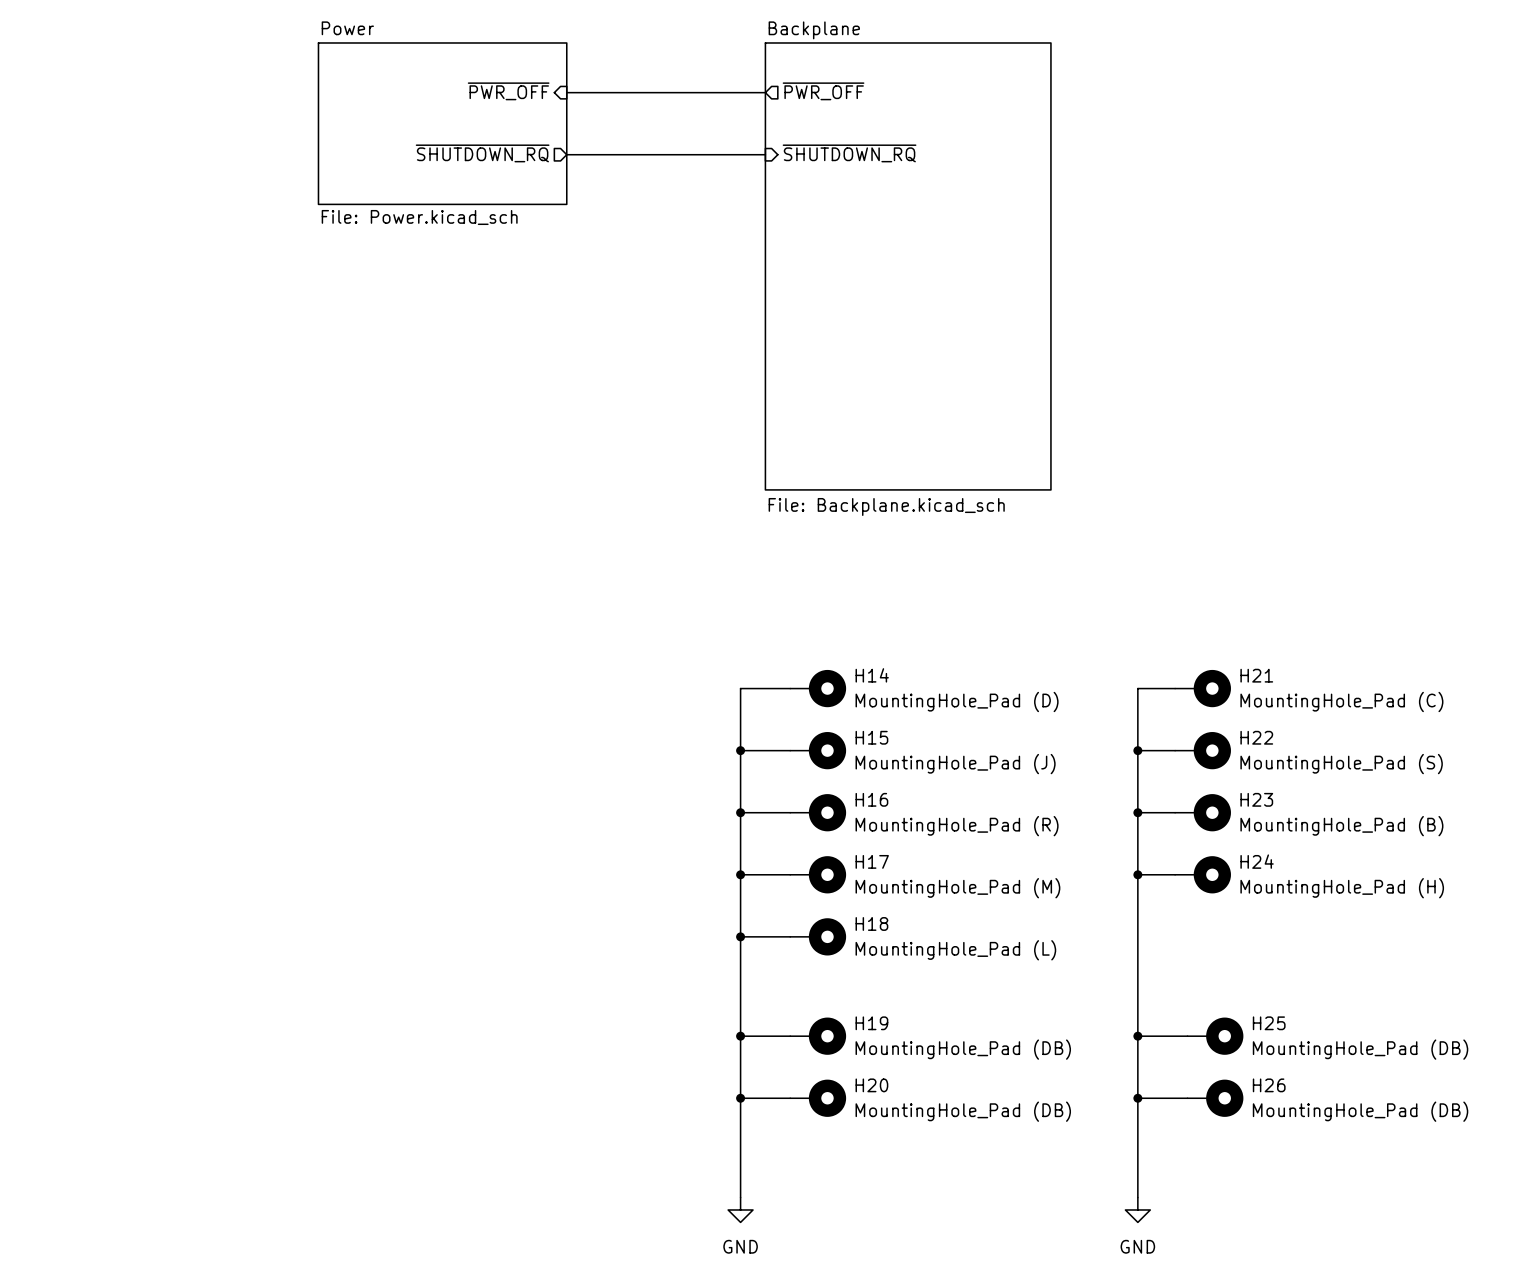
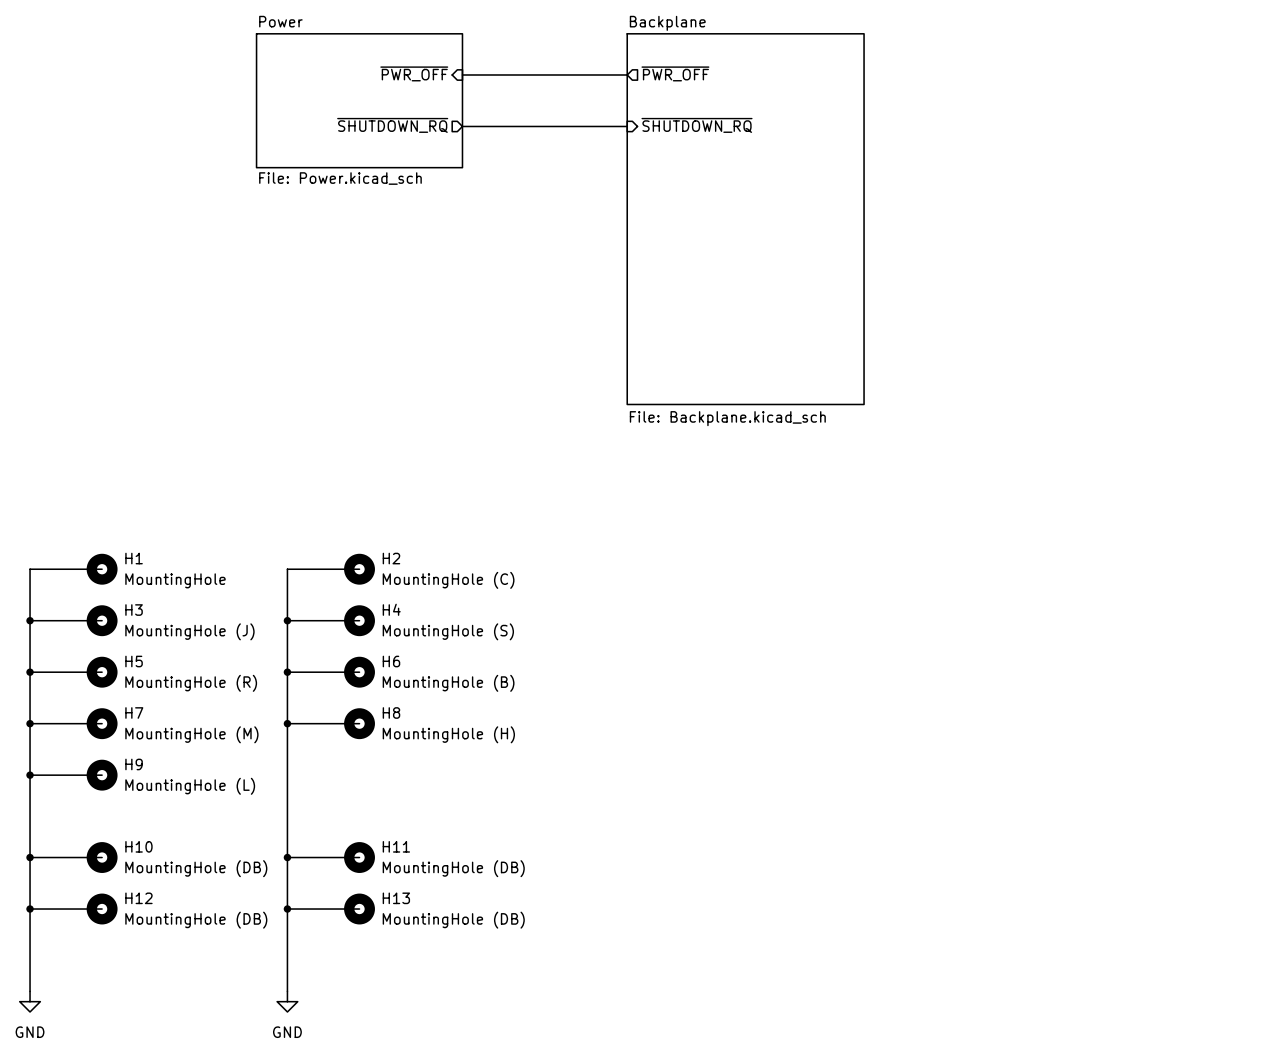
wire: none -> (102, 569) (30, 569) (30, 991)
H1: none -> MountingHole (102, 569)
wire: none -> (359, 569) (287, 569) (287, 991)
H2: none -> MountingHole (C) (359, 569)
wire: (790, 688) (740, 688) (740, 1197) -> none
H14: MountingHole_Pad (D) (818, 688) -> none
wire: (1175, 688) (1137, 688) (1137, 1197) -> none
H21: MountingHole_Pad (C) (1203, 688) -> none
wire: none -> (30, 620) (102, 620)
junction: none -> (30, 620)
H3: none -> MountingHole (J) (102, 620)
wire: none -> (287, 620) (359, 620)
junction: none -> (287, 620)
H4: none -> MountingHole (S) (359, 620)
wire: (740, 750) (790, 750) -> none
junction: (740, 750) -> none
H15: MountingHole_Pad (J) (818, 750) -> none
wire: (1137, 750) (1175, 750) -> none
junction: (1137, 750) -> none
H22: MountingHole_Pad (S) (1203, 750) -> none
wire: none -> (30, 672) (102, 672)
junction: none -> (30, 672)
H5: none -> MountingHole (R) (102, 672)
wire: none -> (287, 672) (359, 672)
junction: none -> (287, 672)
H6: none -> MountingHole (B) (359, 672)
wire: (740, 812) (790, 812) -> none
junction: (740, 812) -> none
H16: MountingHole_Pad (R) (818, 812) -> none
wire: (1137, 812) (1175, 812) -> none
junction: (1137, 812) -> none
H23: MountingHole_Pad (B) (1203, 812) -> none
wire: none -> (30, 723) (102, 723)
junction: none -> (30, 723)
H7: none -> MountingHole (M) (102, 723)
wire: none -> (287, 723) (359, 723)
junction: none -> (287, 723)
H8: none -> MountingHole (H) (359, 723)
wire: (740, 874) (790, 874) -> none
junction: (740, 874) -> none
H17: MountingHole_Pad (M) (818, 874) -> none
wire: (1137, 874) (1175, 874) -> none
junction: (1137, 874) -> none
H24: MountingHole_Pad (H) (1203, 874) -> none
wire: none -> (30, 775) (102, 775)
junction: none -> (30, 775)
H9: none -> MountingHole (L) (102, 775)
wire: (740, 936) (790, 936) -> none
junction: (740, 936) -> none
H18: MountingHole_Pad (L) (818, 936) -> none
wire: none -> (30, 857) (102, 857)
junction: none -> (30, 857)
H10: none -> MountingHole (DB) (102, 857)
wire: none -> (287, 857) (359, 857)
junction: none -> (287, 857)
H11: none -> MountingHole (DB) (359, 857)
wire: (740, 1036) (790, 1036) -> none
junction: (740, 1036) -> none
H19: MountingHole_Pad (DB) (818, 1036) -> none
wire: (1137, 1036) (1187, 1036) -> none
junction: (1137, 1036) -> none
H25: MountingHole_Pad (DB) (1215, 1036) -> none
wire: none -> (30, 909) (102, 909)
junction: none -> (30, 909)
H12: none -> MountingHole (DB) (102, 909)
wire: none -> (287, 909) (359, 909)
junction: none -> (287, 909)
H13: none -> MountingHole (DB) (359, 909)
wire: (740, 1098) (790, 1098) -> none
junction: (740, 1098) -> none
H20: MountingHole_Pad (DB) (818, 1098) -> none
wire: (1137, 1098) (1187, 1098) -> none
junction: (1137, 1098) -> none
H26: MountingHole_Pad (DB) (1215, 1098) -> none
power symbol: none -> GND (30, 1001)
power symbol: none -> GND (287, 1001)
power symbol: GND (740, 1209) -> none
power symbol: GND (1137, 1209) -> none

